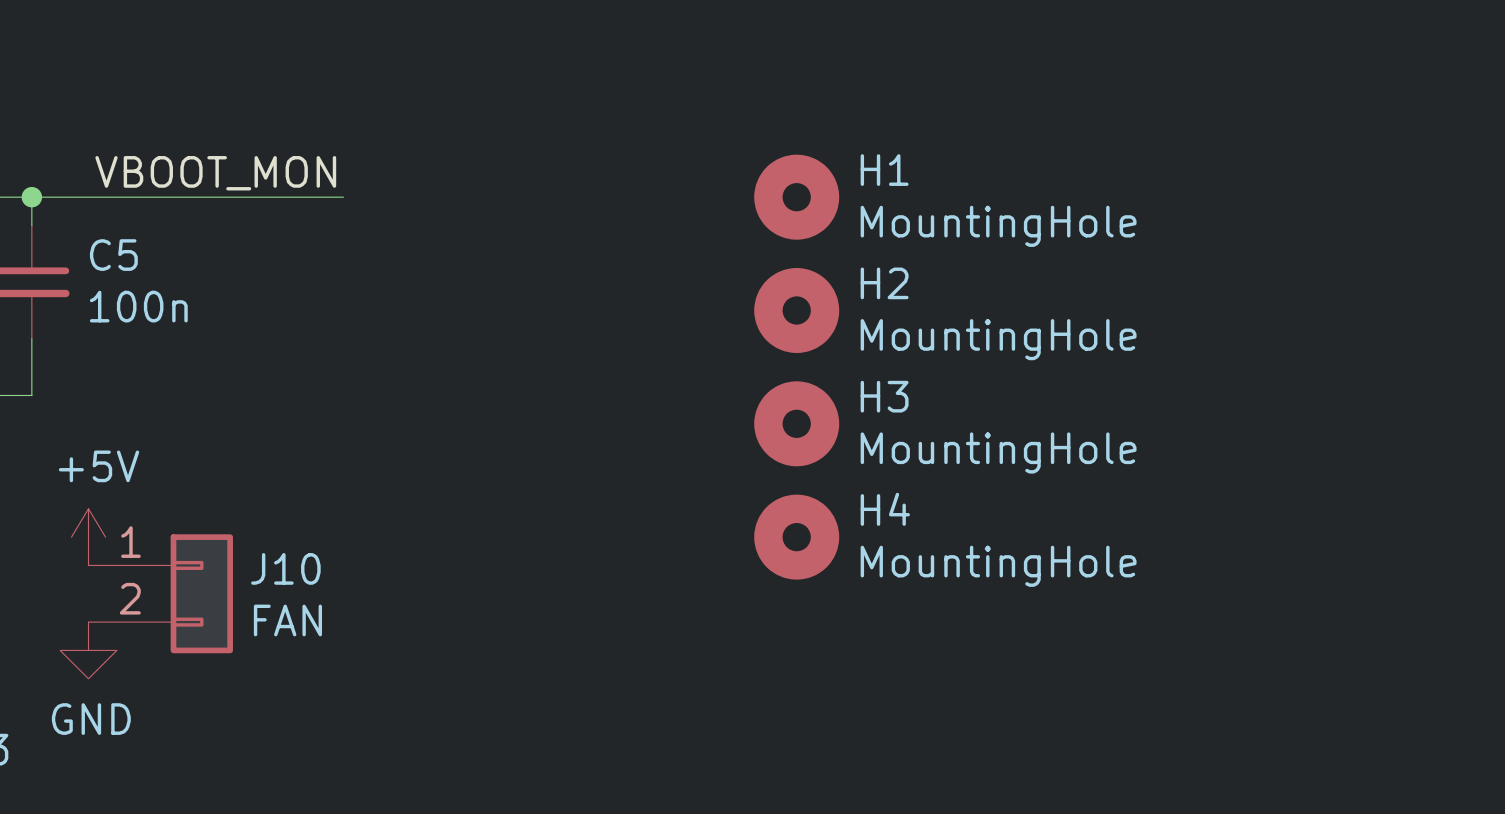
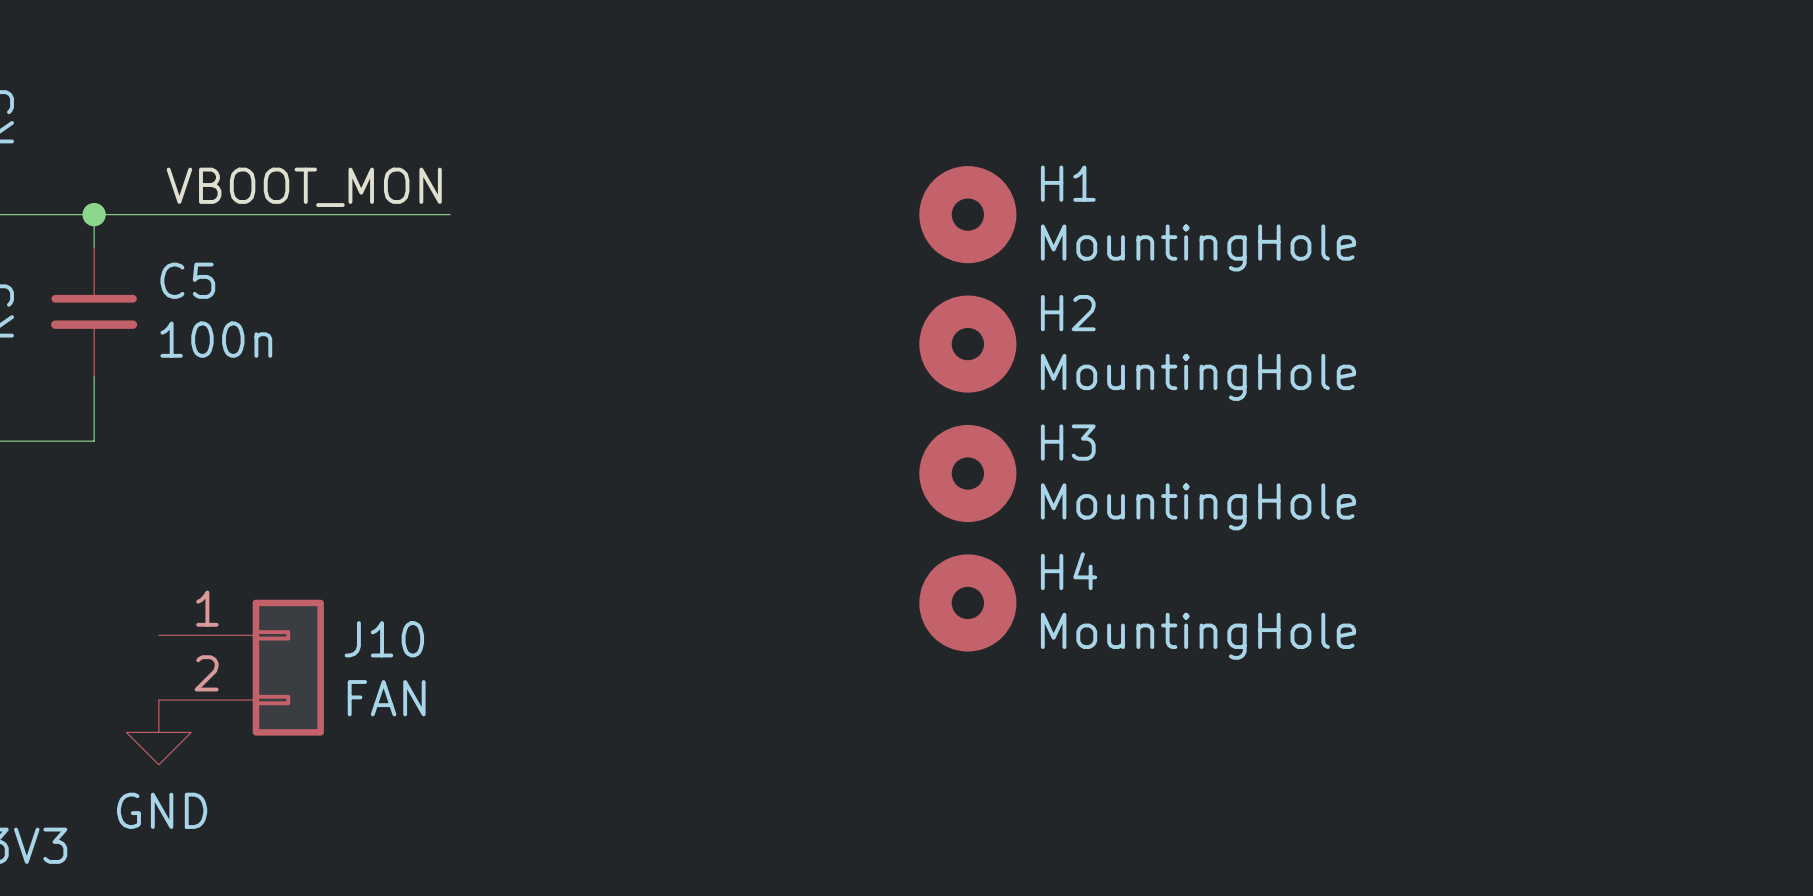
power symbol: +5V (88, 537) -> none

